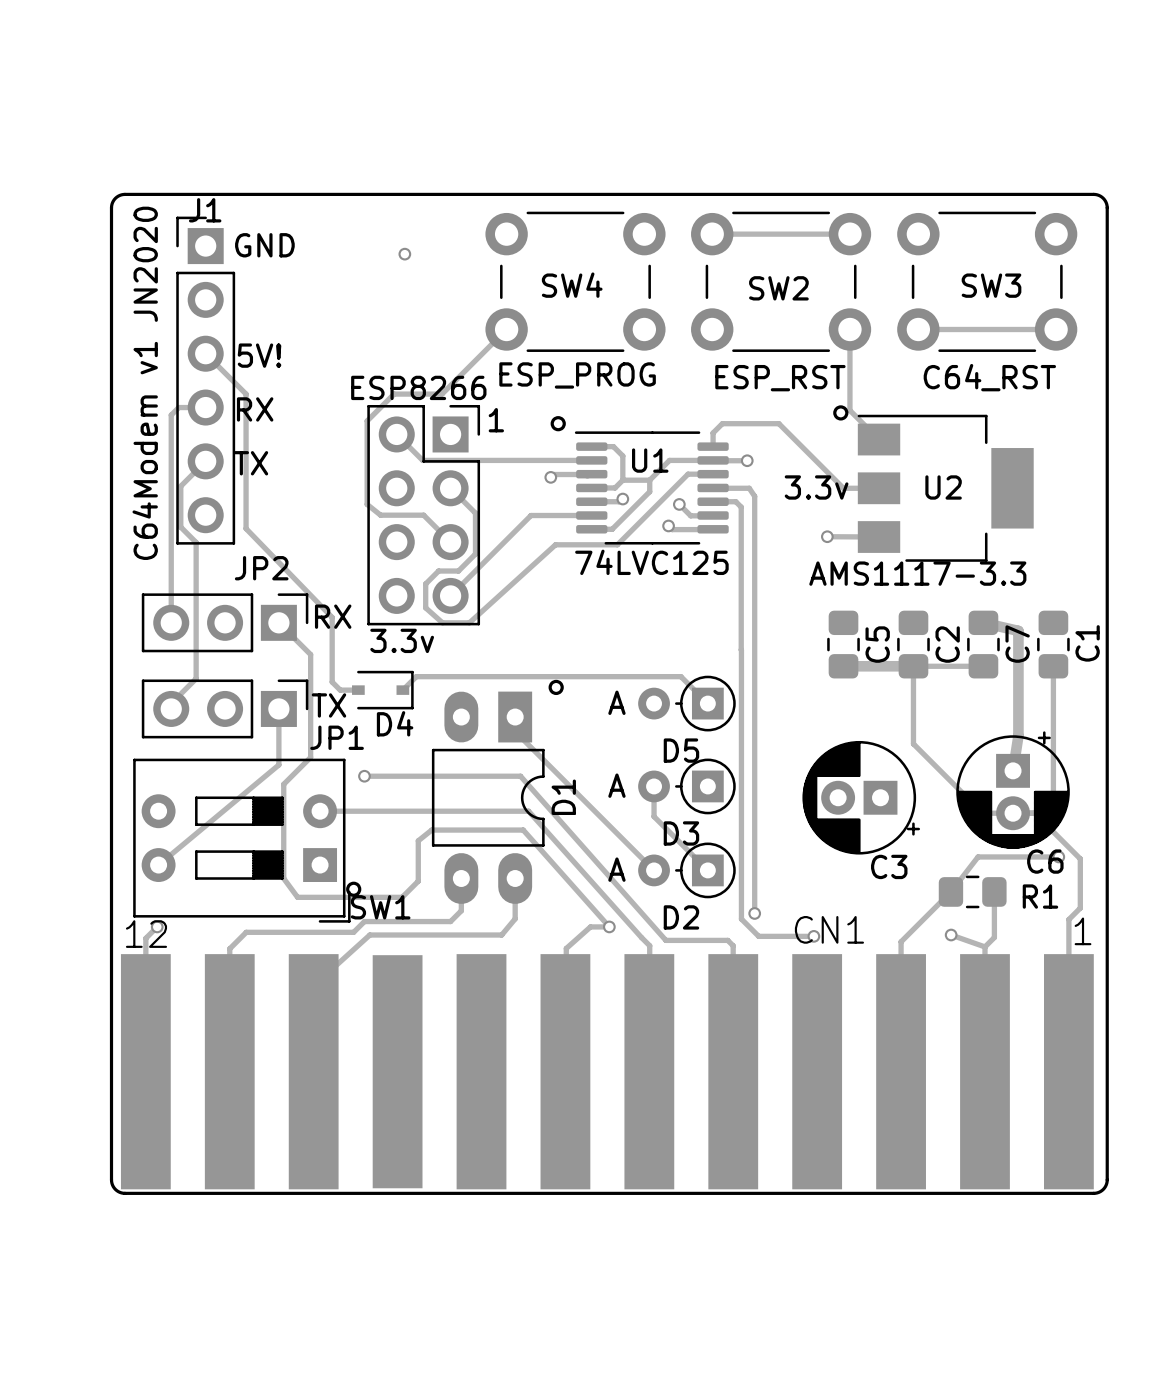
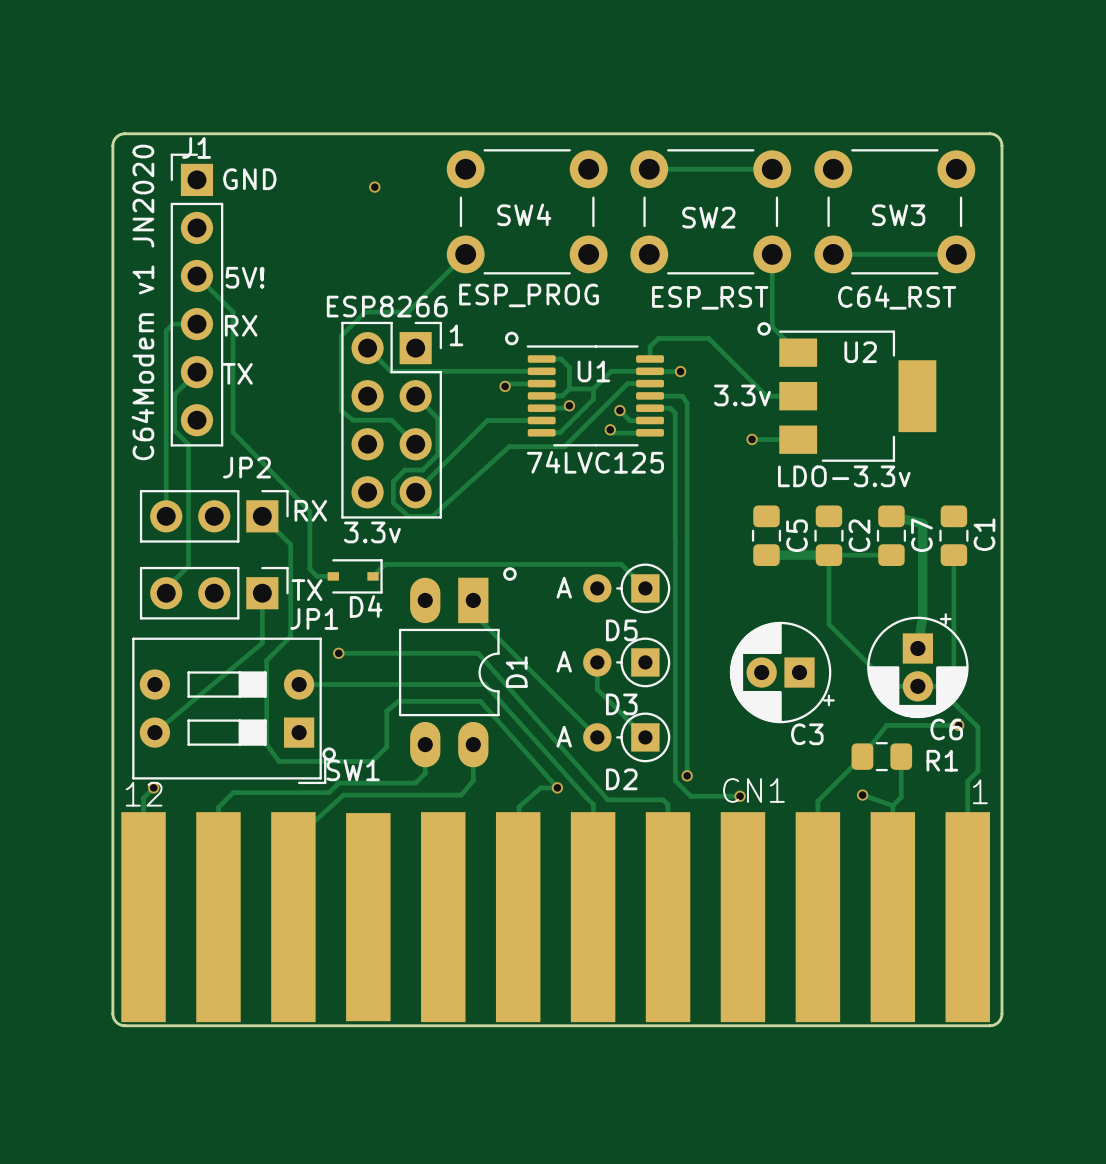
U2 name position: U2 (943, 487) -> U2 (860, 352)
text: AMS1117-3.3 (917, 573) -> LDO-3.3v (844, 476)

